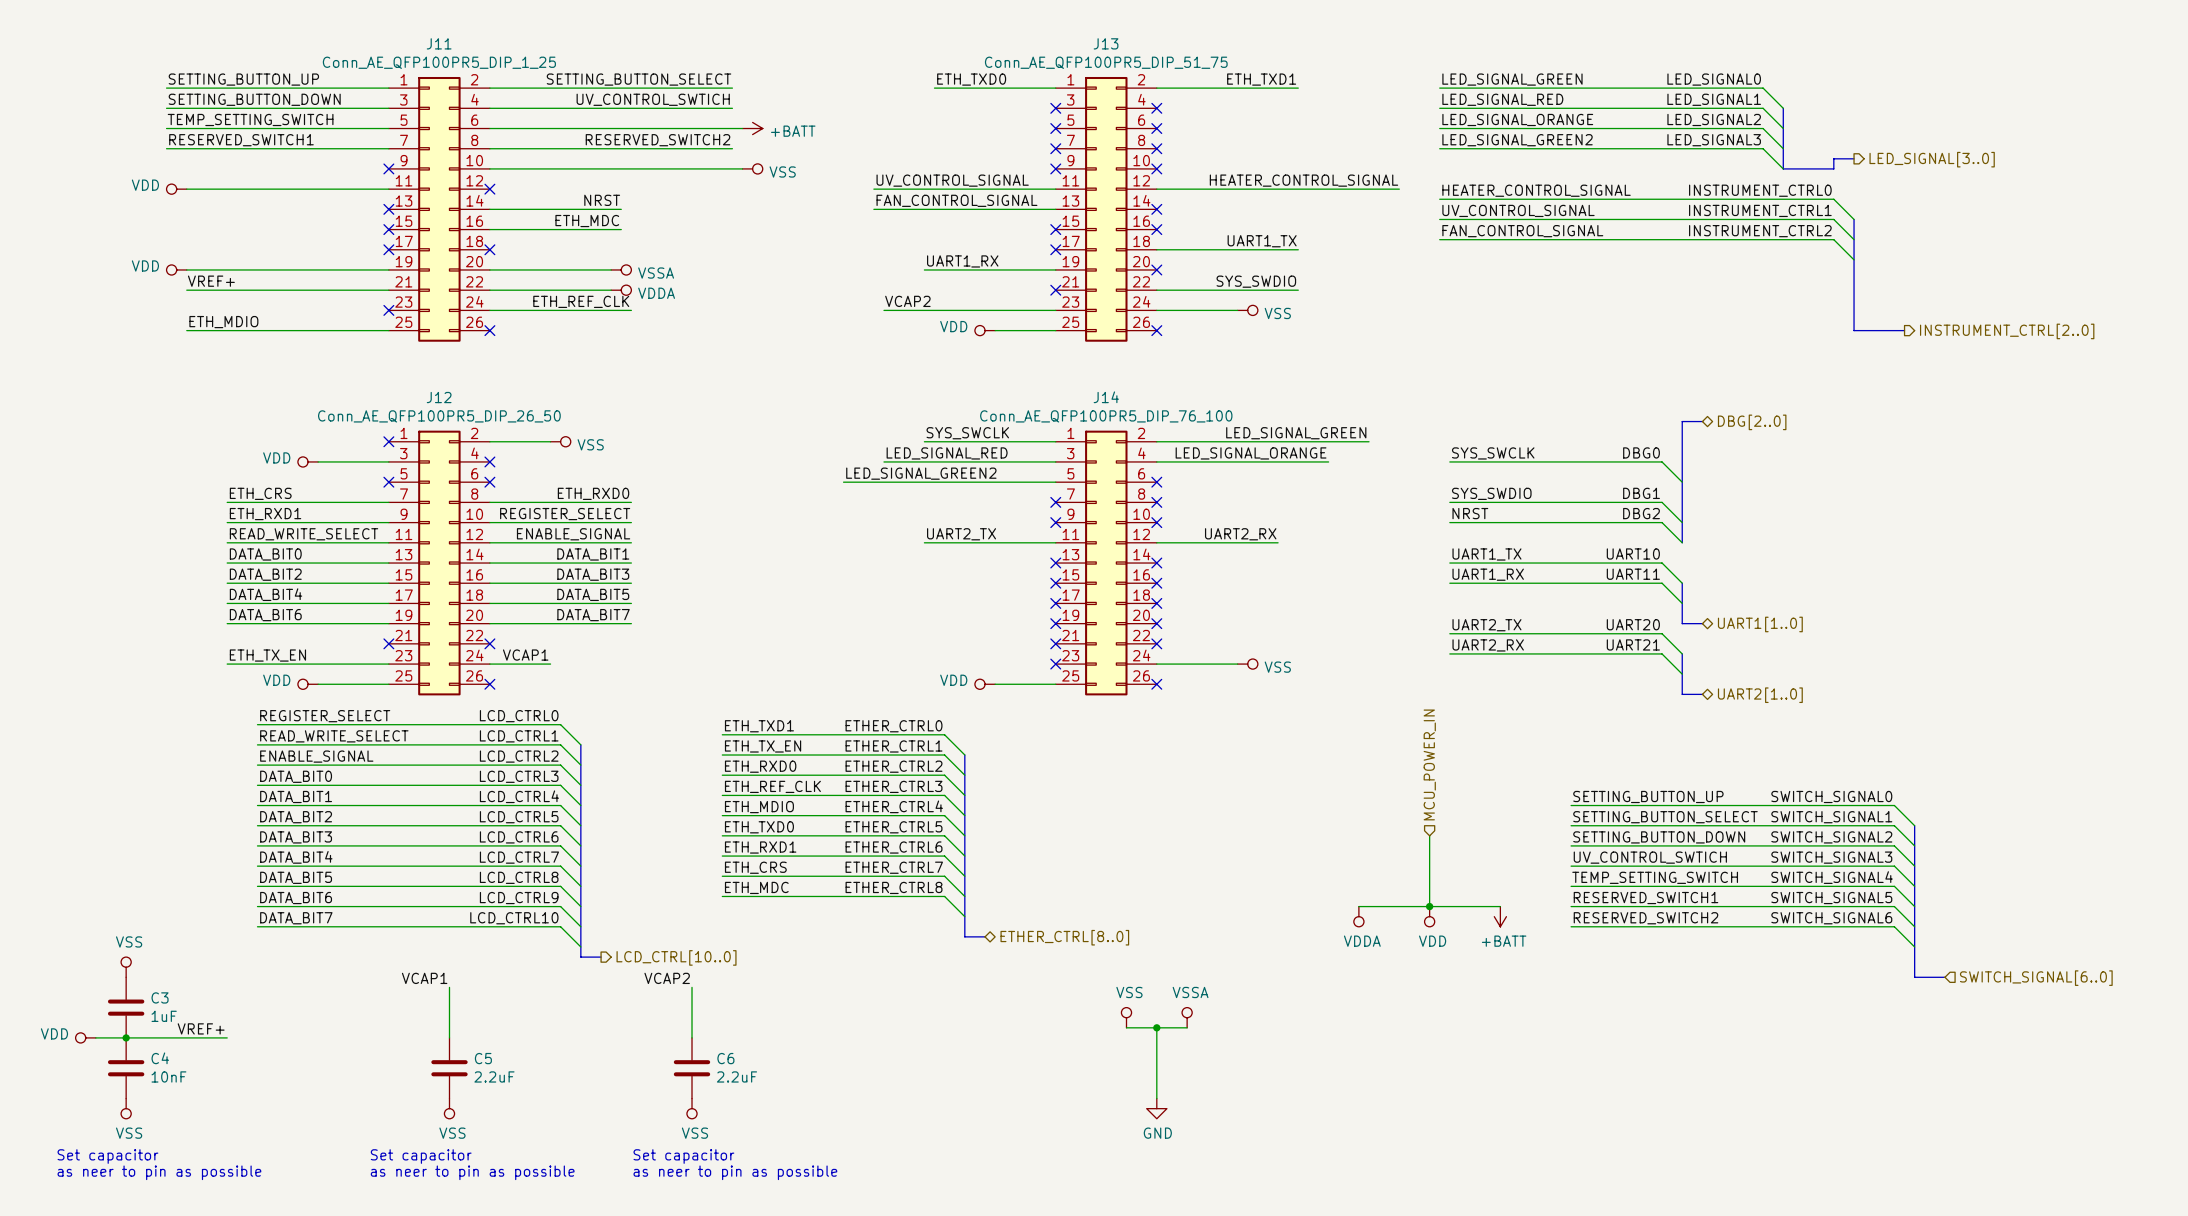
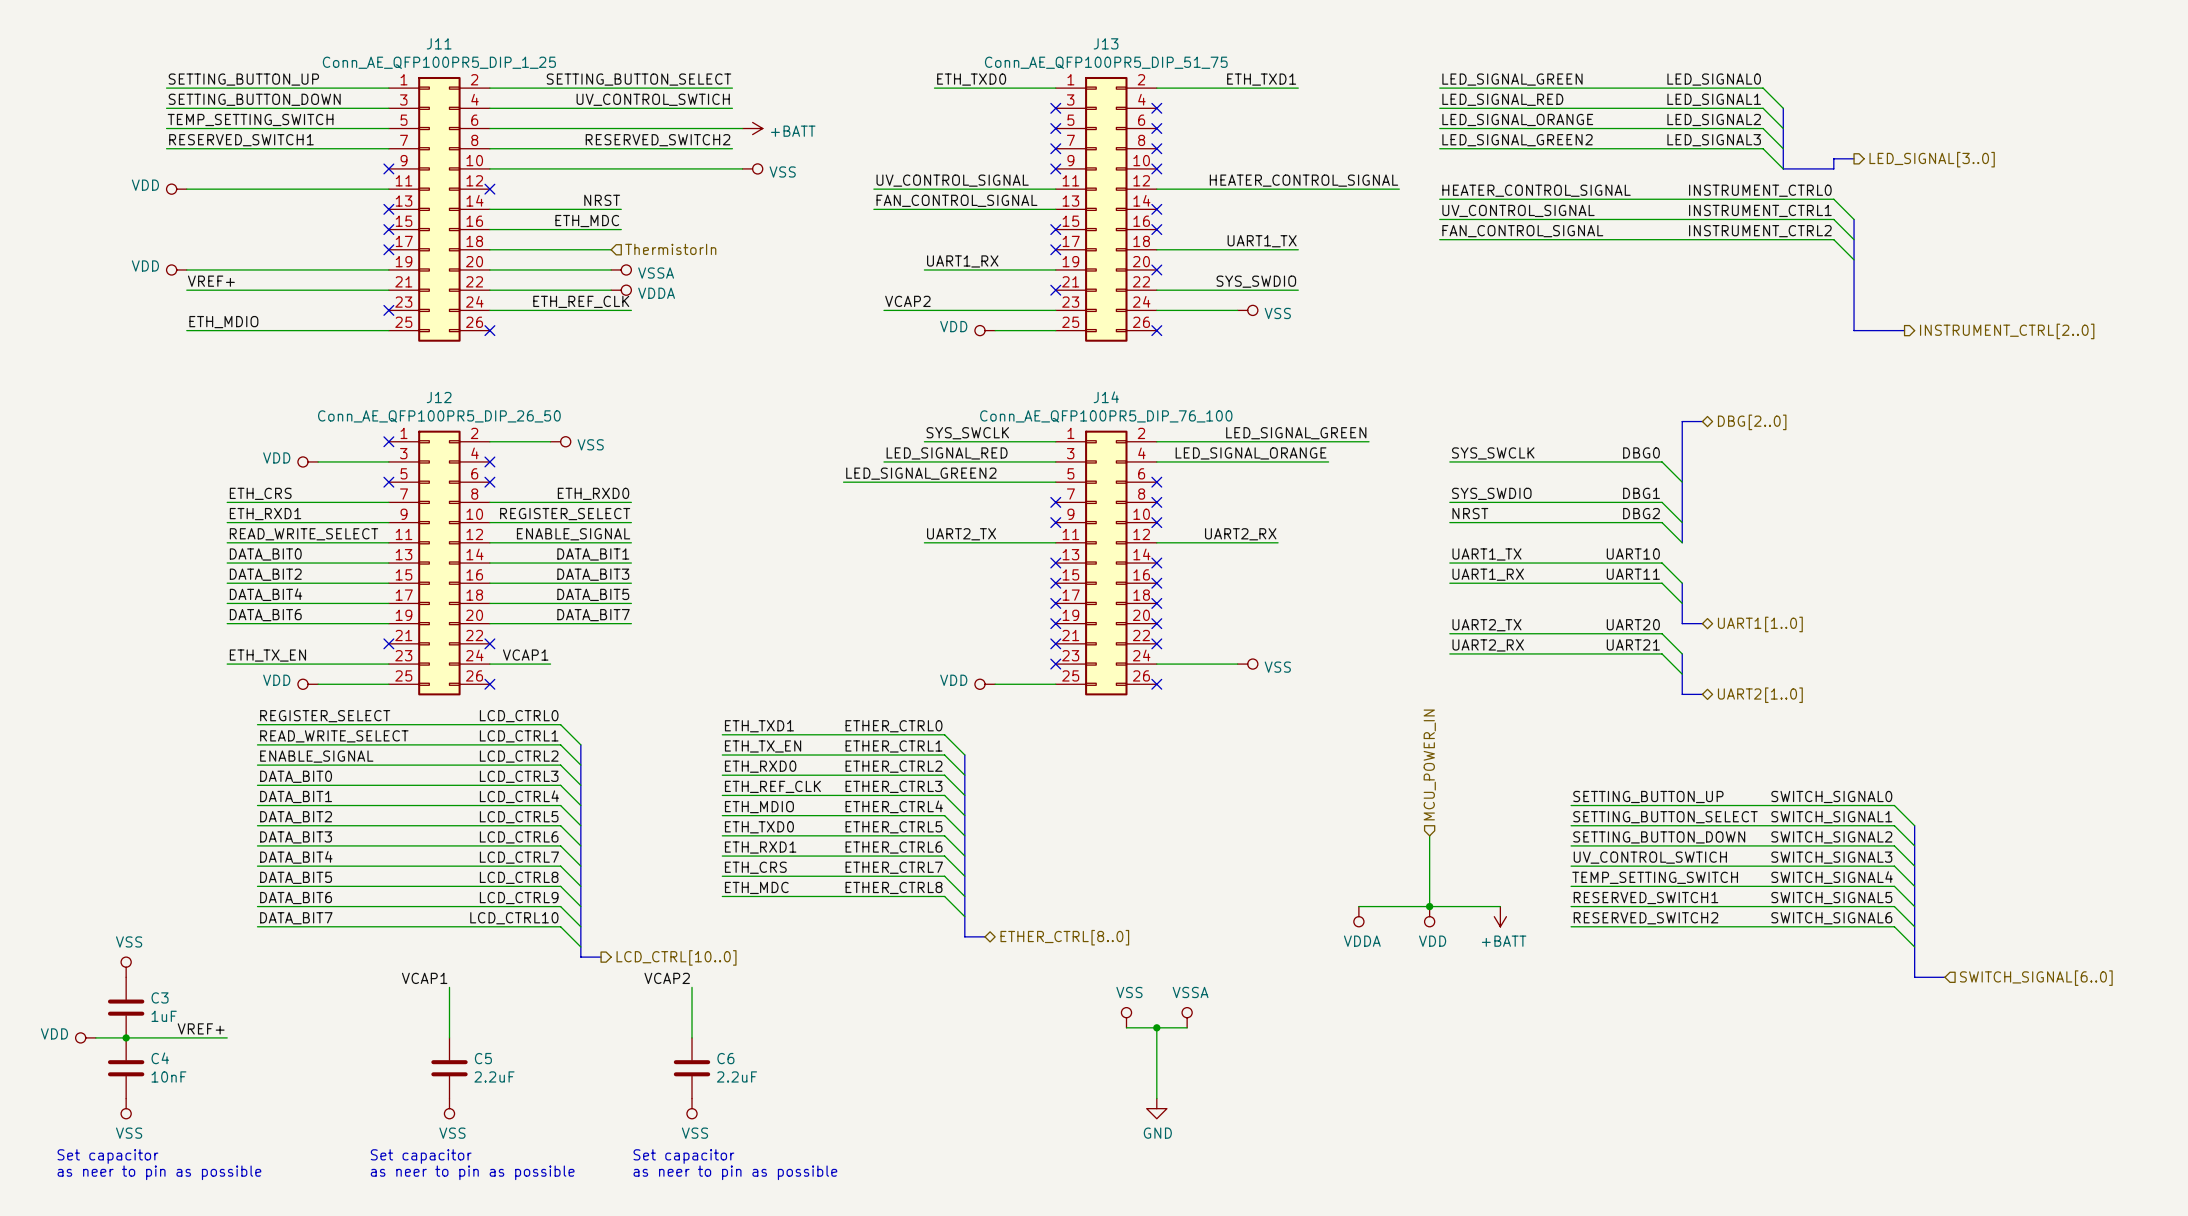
wire: none -> (489, 249) (611, 249)
no-connect mark: (489, 249) -> none
hierarchical label: none -> ThermistorIn (670, 249)

